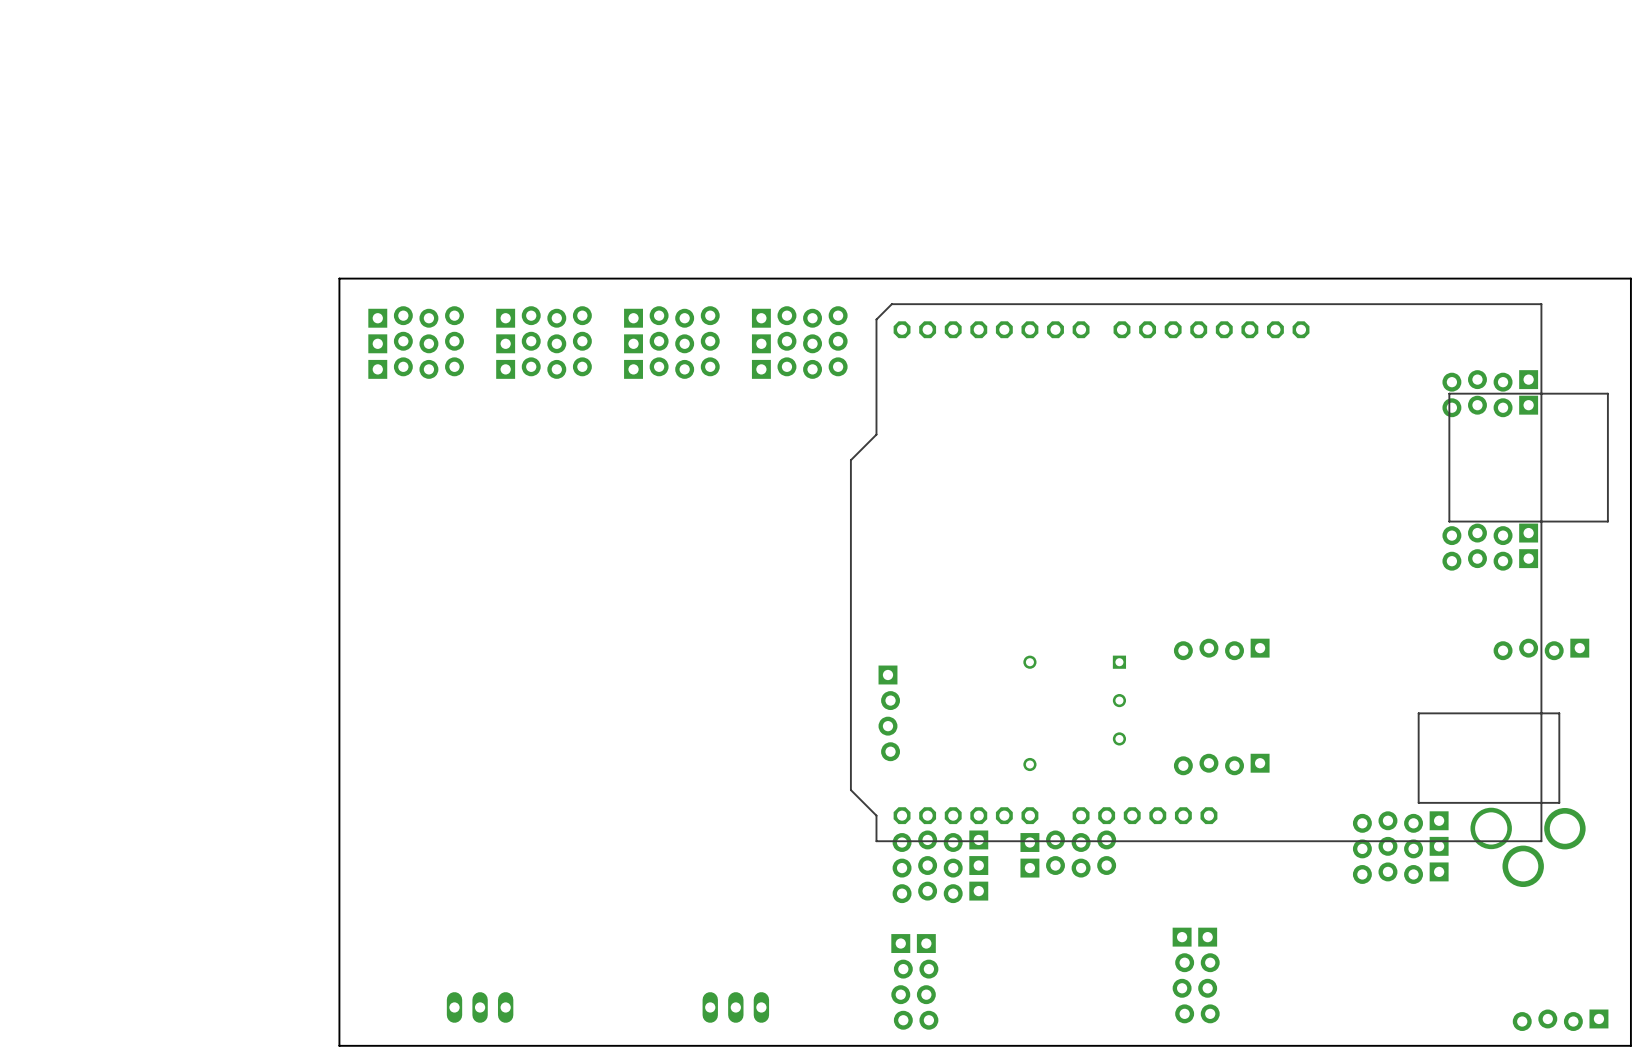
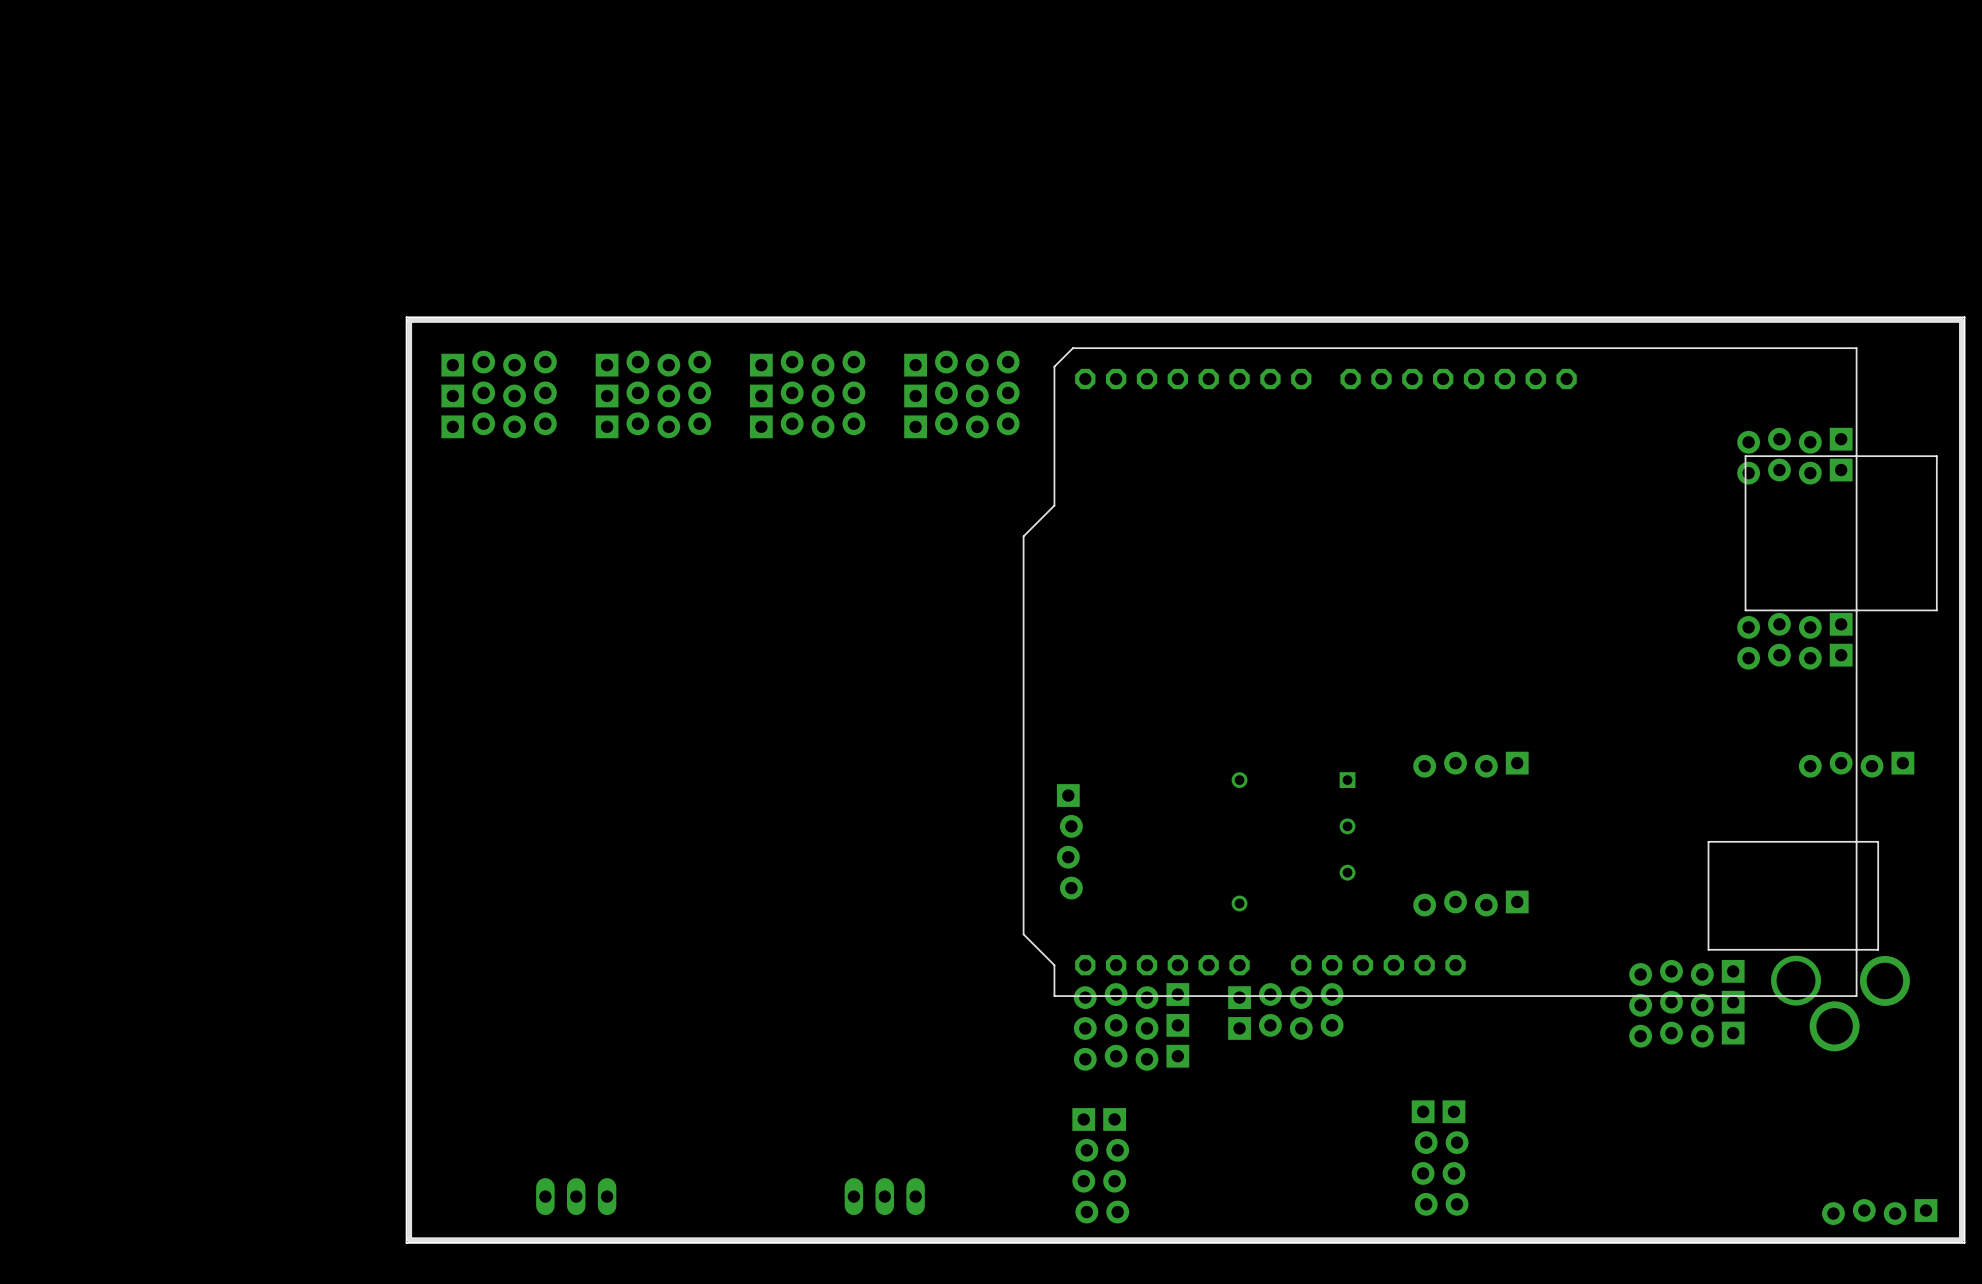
line: none -> (1961, 320) (409, 320) (409, 1239) (1961, 1239) (1961, 320)

